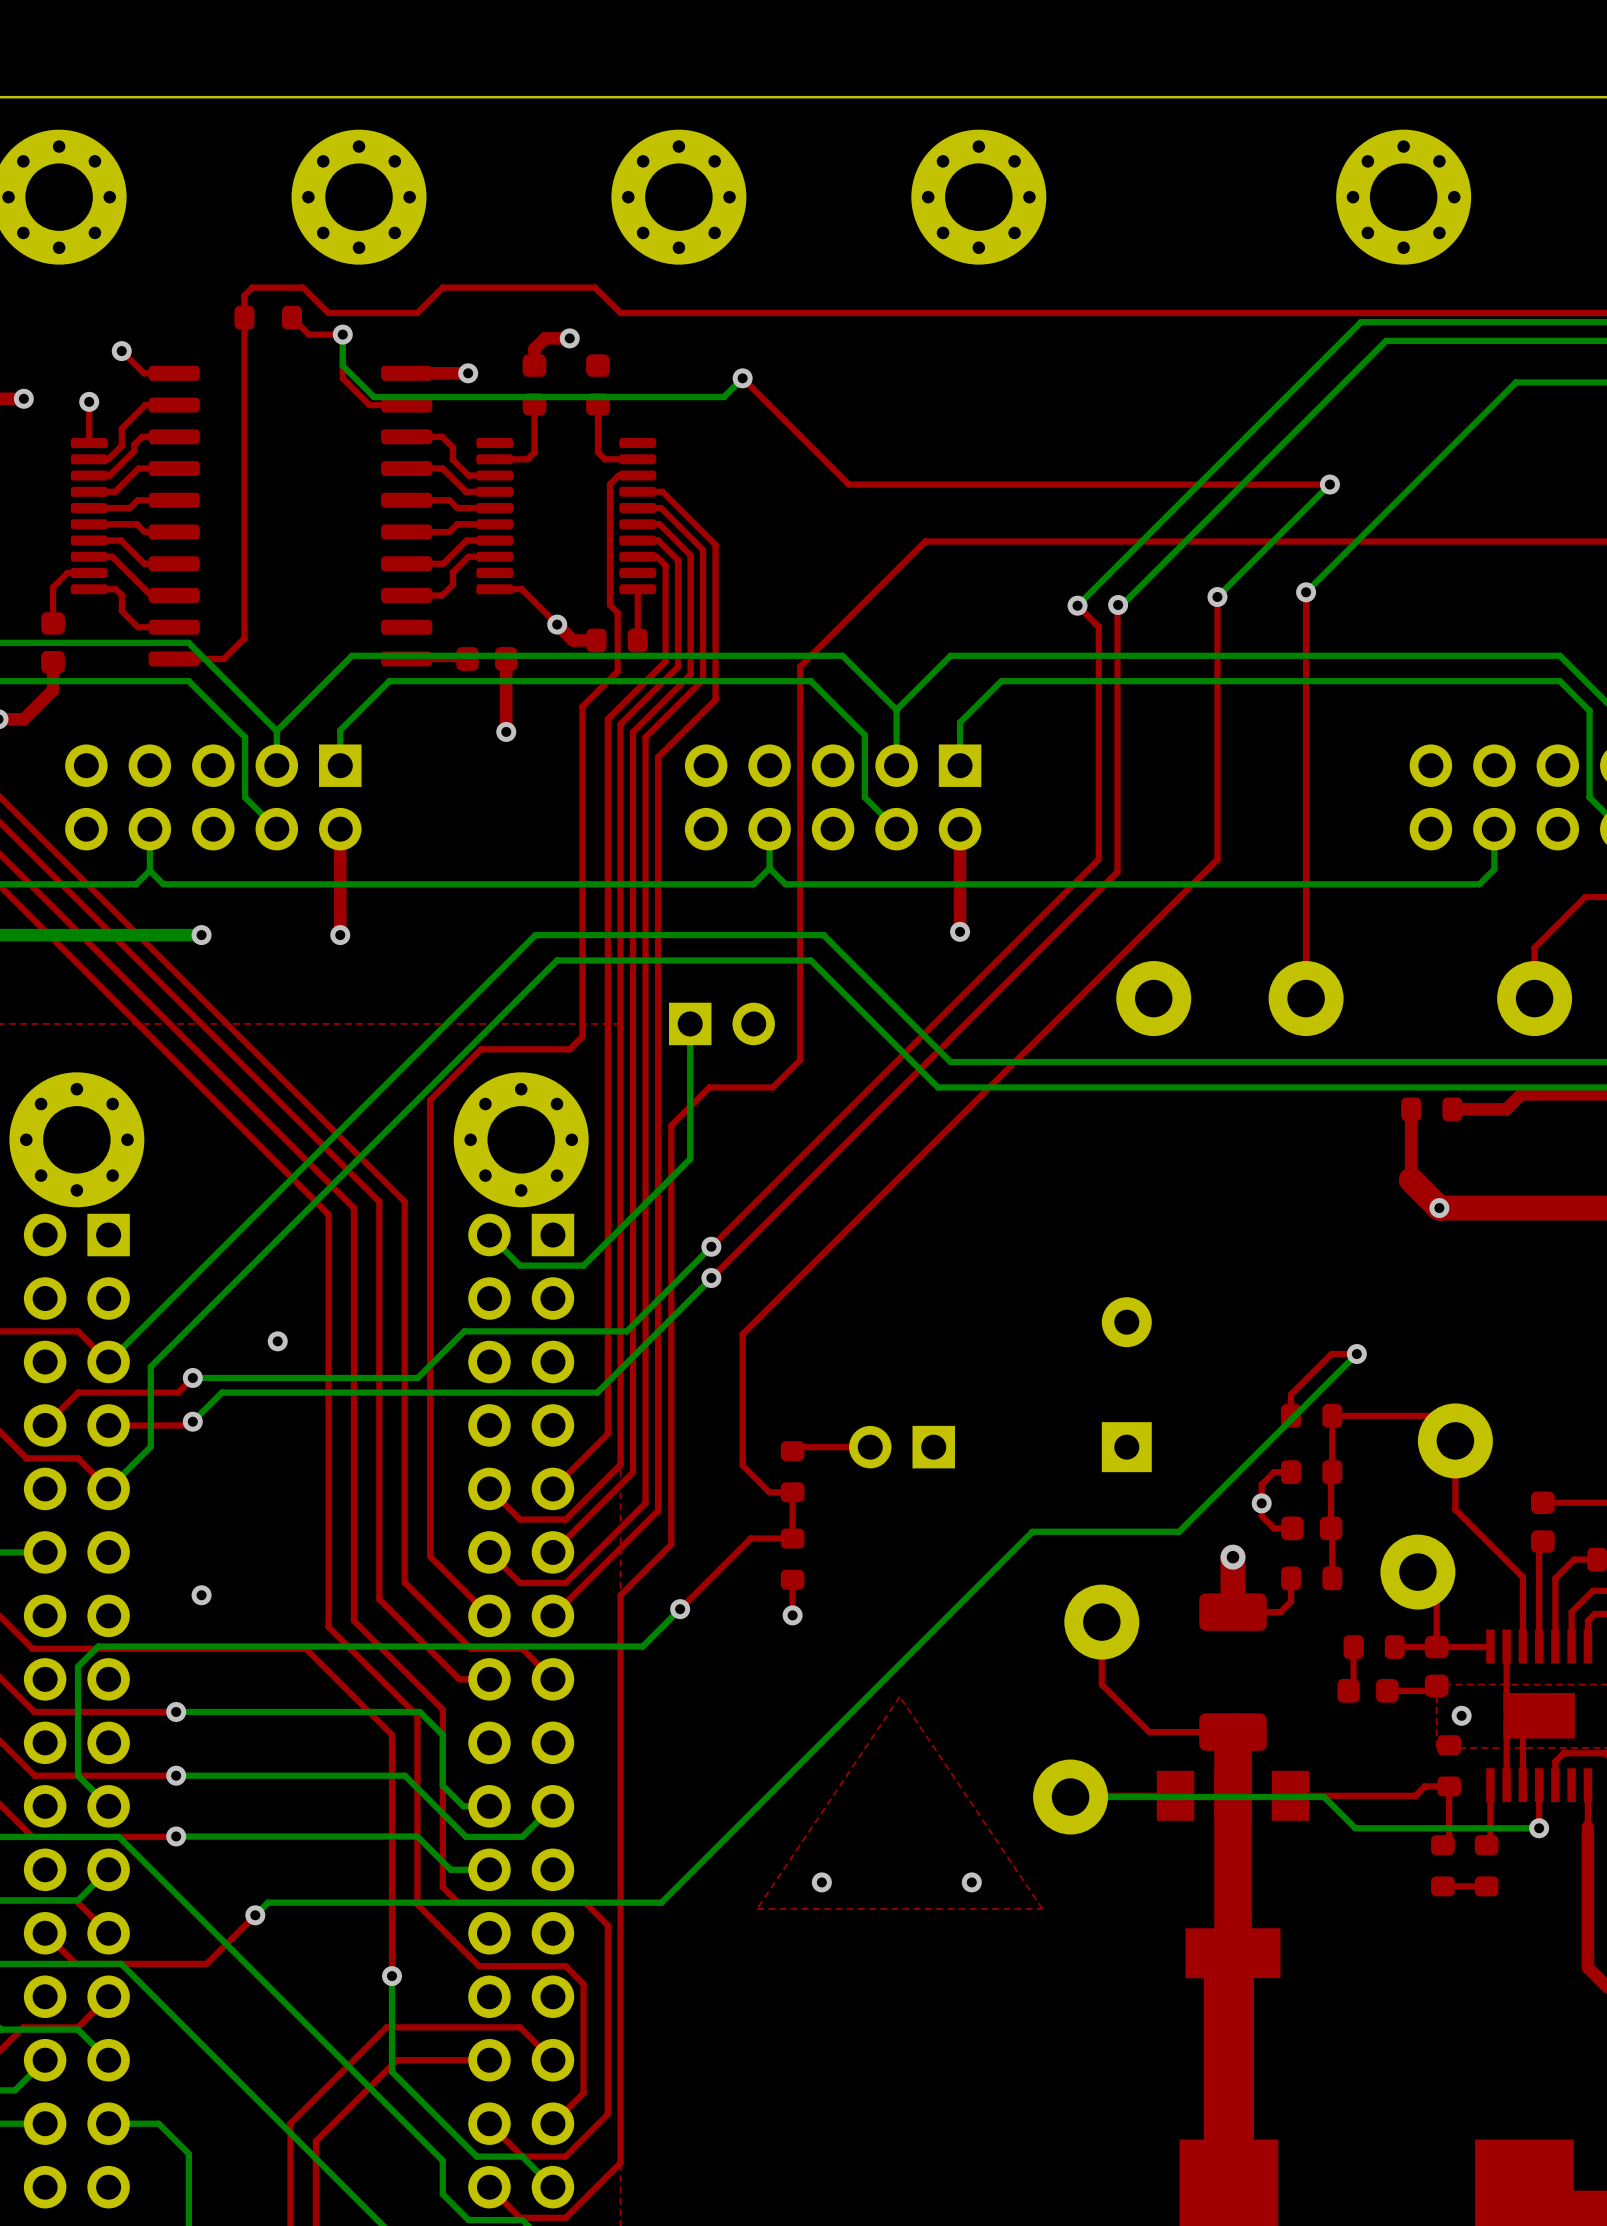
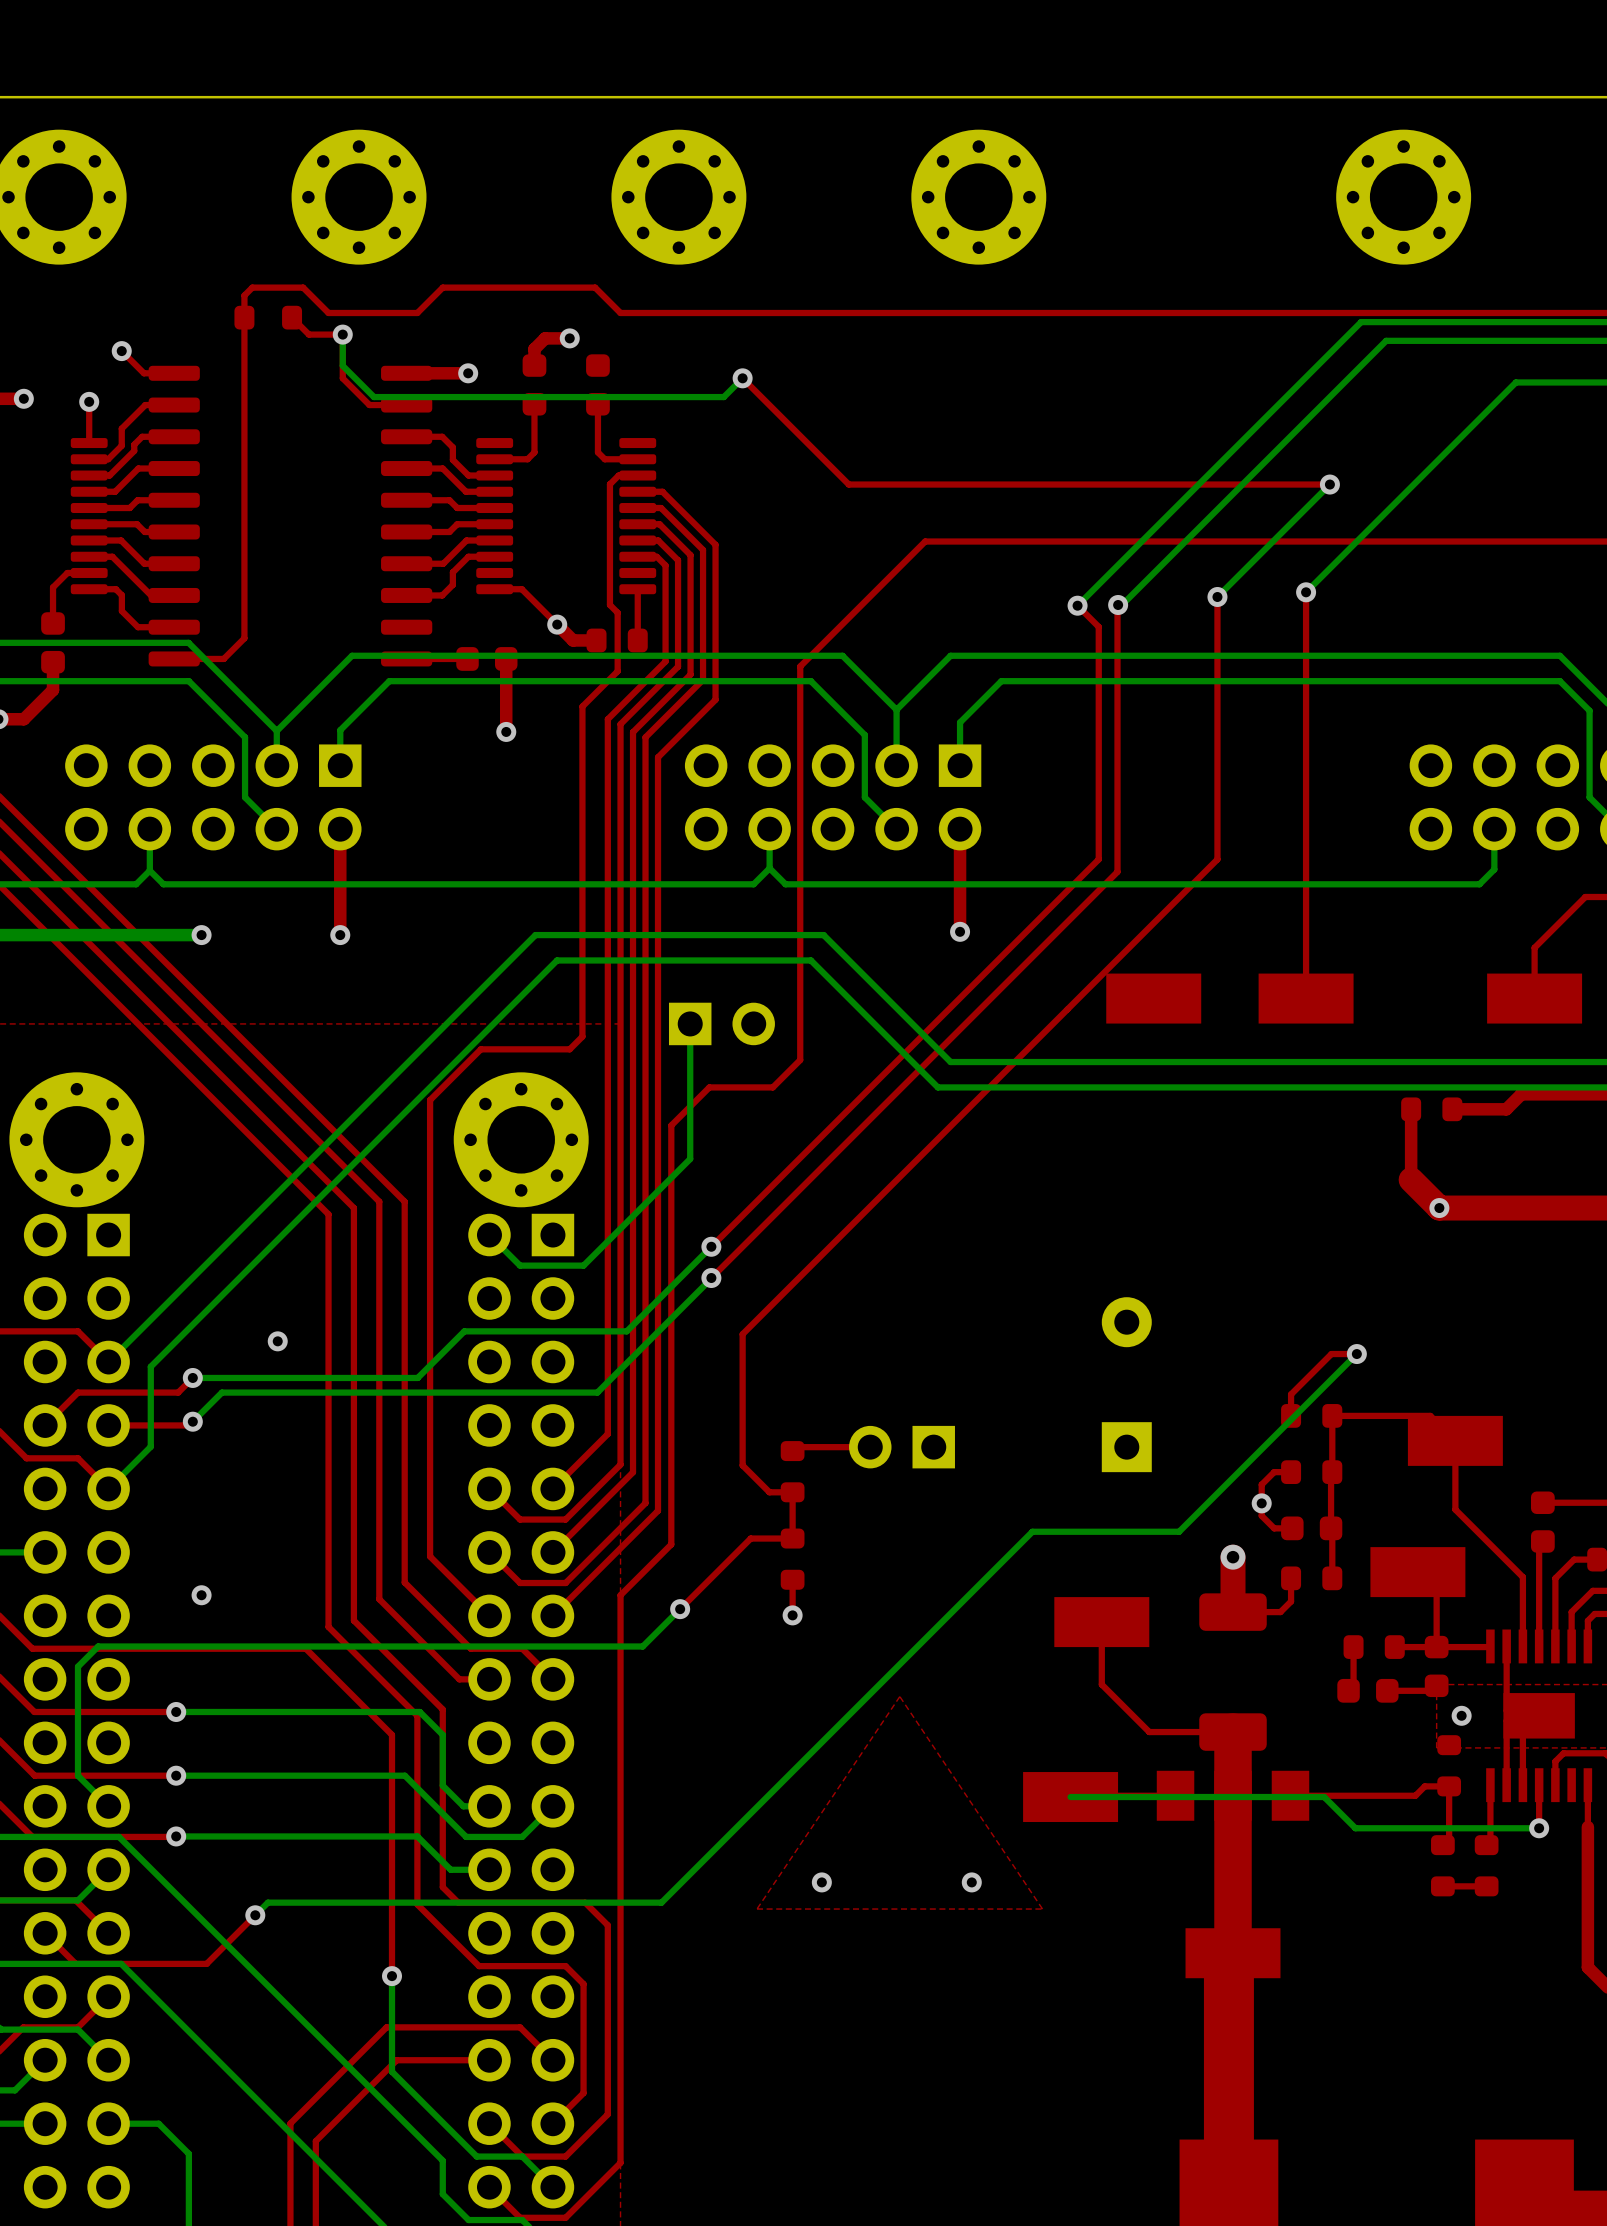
part footprint: [1116, 961, 1192, 1037] -> [1106, 973, 1202, 1024]
part footprint: [1268, 961, 1344, 1037] -> [1258, 973, 1354, 1024]
part footprint: [1497, 961, 1573, 1037] -> [1487, 973, 1583, 1024]
part footprint: [1417, 1403, 1493, 1479] -> [1407, 1415, 1503, 1466]
part footprint: [1380, 1534, 1456, 1610] -> [1370, 1547, 1466, 1598]
part footprint: [1064, 1584, 1140, 1660] -> [1054, 1597, 1150, 1648]
part footprint: [1033, 1759, 1109, 1835] -> [1023, 1772, 1119, 1823]

